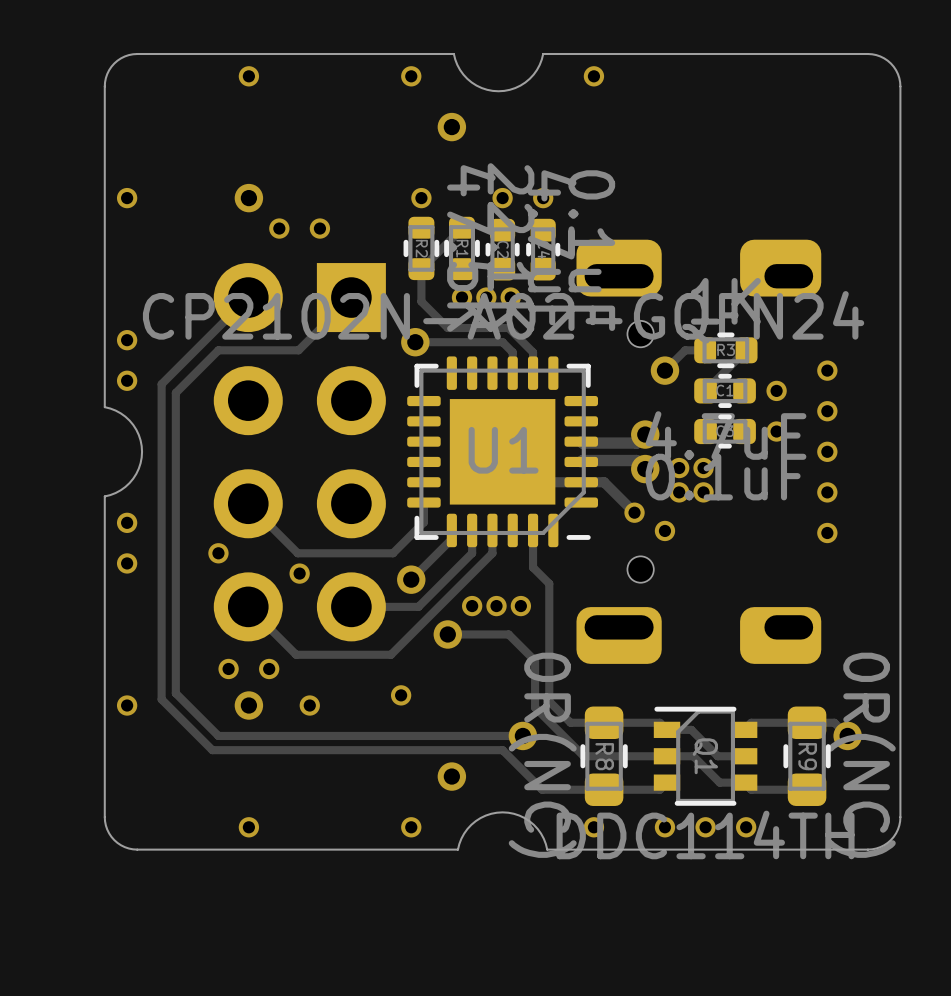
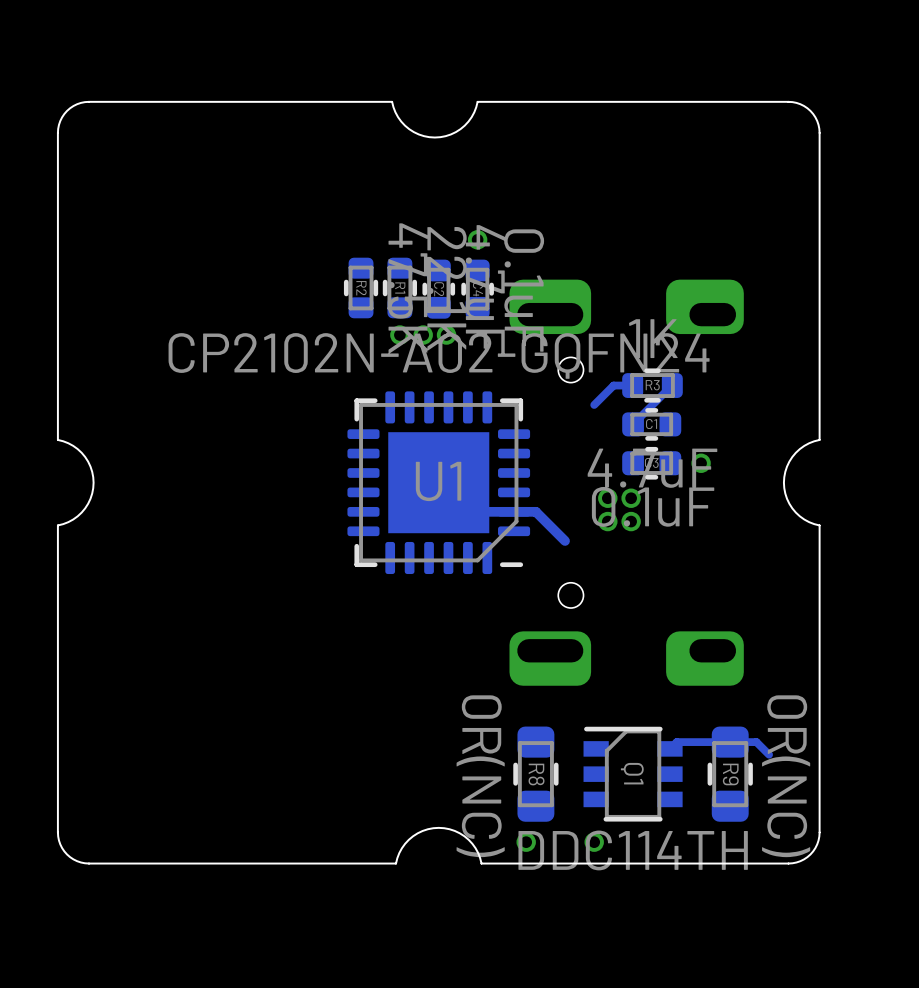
via: (248, 76) -> none
via: (411, 76) -> none
via: (593, 76) -> none
via: (451, 127) -> none
via: (127, 198) -> none
via: (248, 198) -> none
via: (421, 198) -> none
via: (502, 198) -> none
via: (279, 228) -> none
via: (319, 228) -> none
track: (462, 228) (421, 269) (421, 301) (447, 327) (508, 327) (533, 352) (533, 373) -> none
track: (248, 297) (161, 384) (161, 699) (212, 750) (502, 750) (542, 789) (659, 789) (667, 782) -> none
track: (351, 297) (298, 350) (218, 350) (175, 392) (175, 693) (218, 735) (522, 735) -> none
via: (127, 340) -> none
track: (415, 342) (502, 342) (512, 352) (512, 373) -> none
via: (415, 342) -> none
via: (664, 370) -> none
via: (827, 370) -> none
via: (127, 380) -> none
via: (776, 390) -> none
board edge: (900, 407) (900, 496) -> (819, 439) (804, 445) (792, 457) (785, 471) (783, 482) (785, 493) (792, 508) (804, 519) (819, 525)
via: (827, 411) -> none
track: (645, 434) (636, 443) (581, 441) -> none
via: (645, 434) -> none
via: (827, 451) -> none
part: (299, 452) -> none
track: (581, 461) (636, 460) (645, 469) -> none
via: (645, 469) -> none
via: (827, 492) -> none
track: (423, 502) (423, 522) (393, 553) (297, 553) (248, 503) -> none
via: (634, 512) -> none
via: (127, 522) -> none
track: (451, 530) (451, 539) (411, 579) -> none
track: (472, 530) (472, 553) (418, 606) (351, 606) -> none
track: (492, 530) (492, 553) (390, 654) (296, 654) (248, 606) -> none
track: (533, 530) (533, 567) (549, 583) (549, 701) (570, 722) (659, 722) (667, 729) (691, 729) (717, 756) (744, 756) -> none
via: (664, 530) -> none
via: (827, 532) -> none
via: (218, 553) -> none
via: (127, 563) -> none
via: (299, 573) -> none
via: (411, 579) -> none
via: (472, 606) -> none
via: (496, 606) -> none
via: (520, 606) -> none
track: (447, 634) (508, 634) (535, 660) (535, 707) (583, 756) (693, 756) (719, 782) (744, 782) (751, 789) (807, 789) -> none
via: (447, 634) -> none
via: (228, 668) -> none
via: (269, 668) -> none
via: (401, 695) -> none
via: (127, 705) -> none
via: (248, 705) -> none
via: (309, 705) -> none
via: (522, 735) -> none
via: (847, 735) -> none
via: (451, 776) -> none
via: (248, 827) -> none
via: (411, 827) -> none
via: (705, 827) -> none
via: (746, 827) -> none

